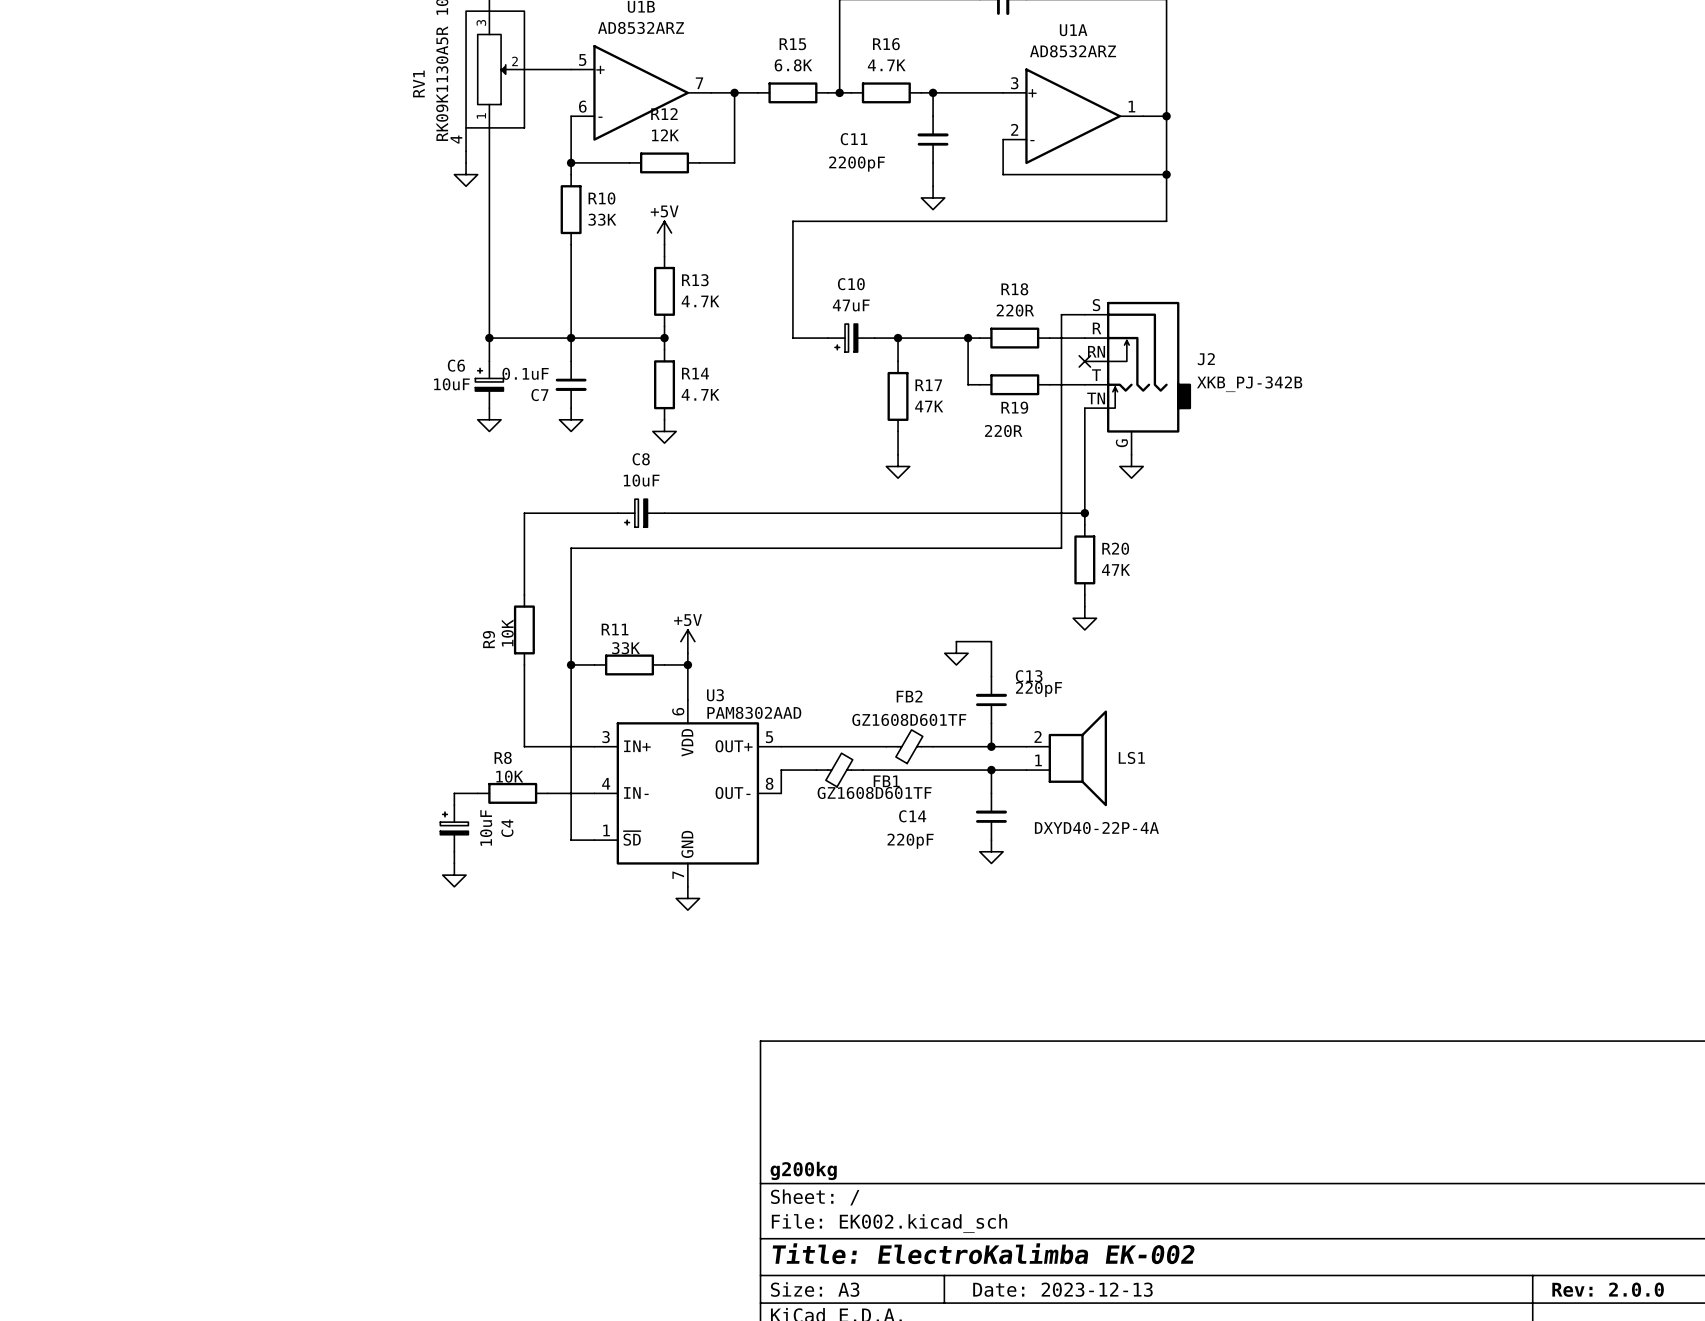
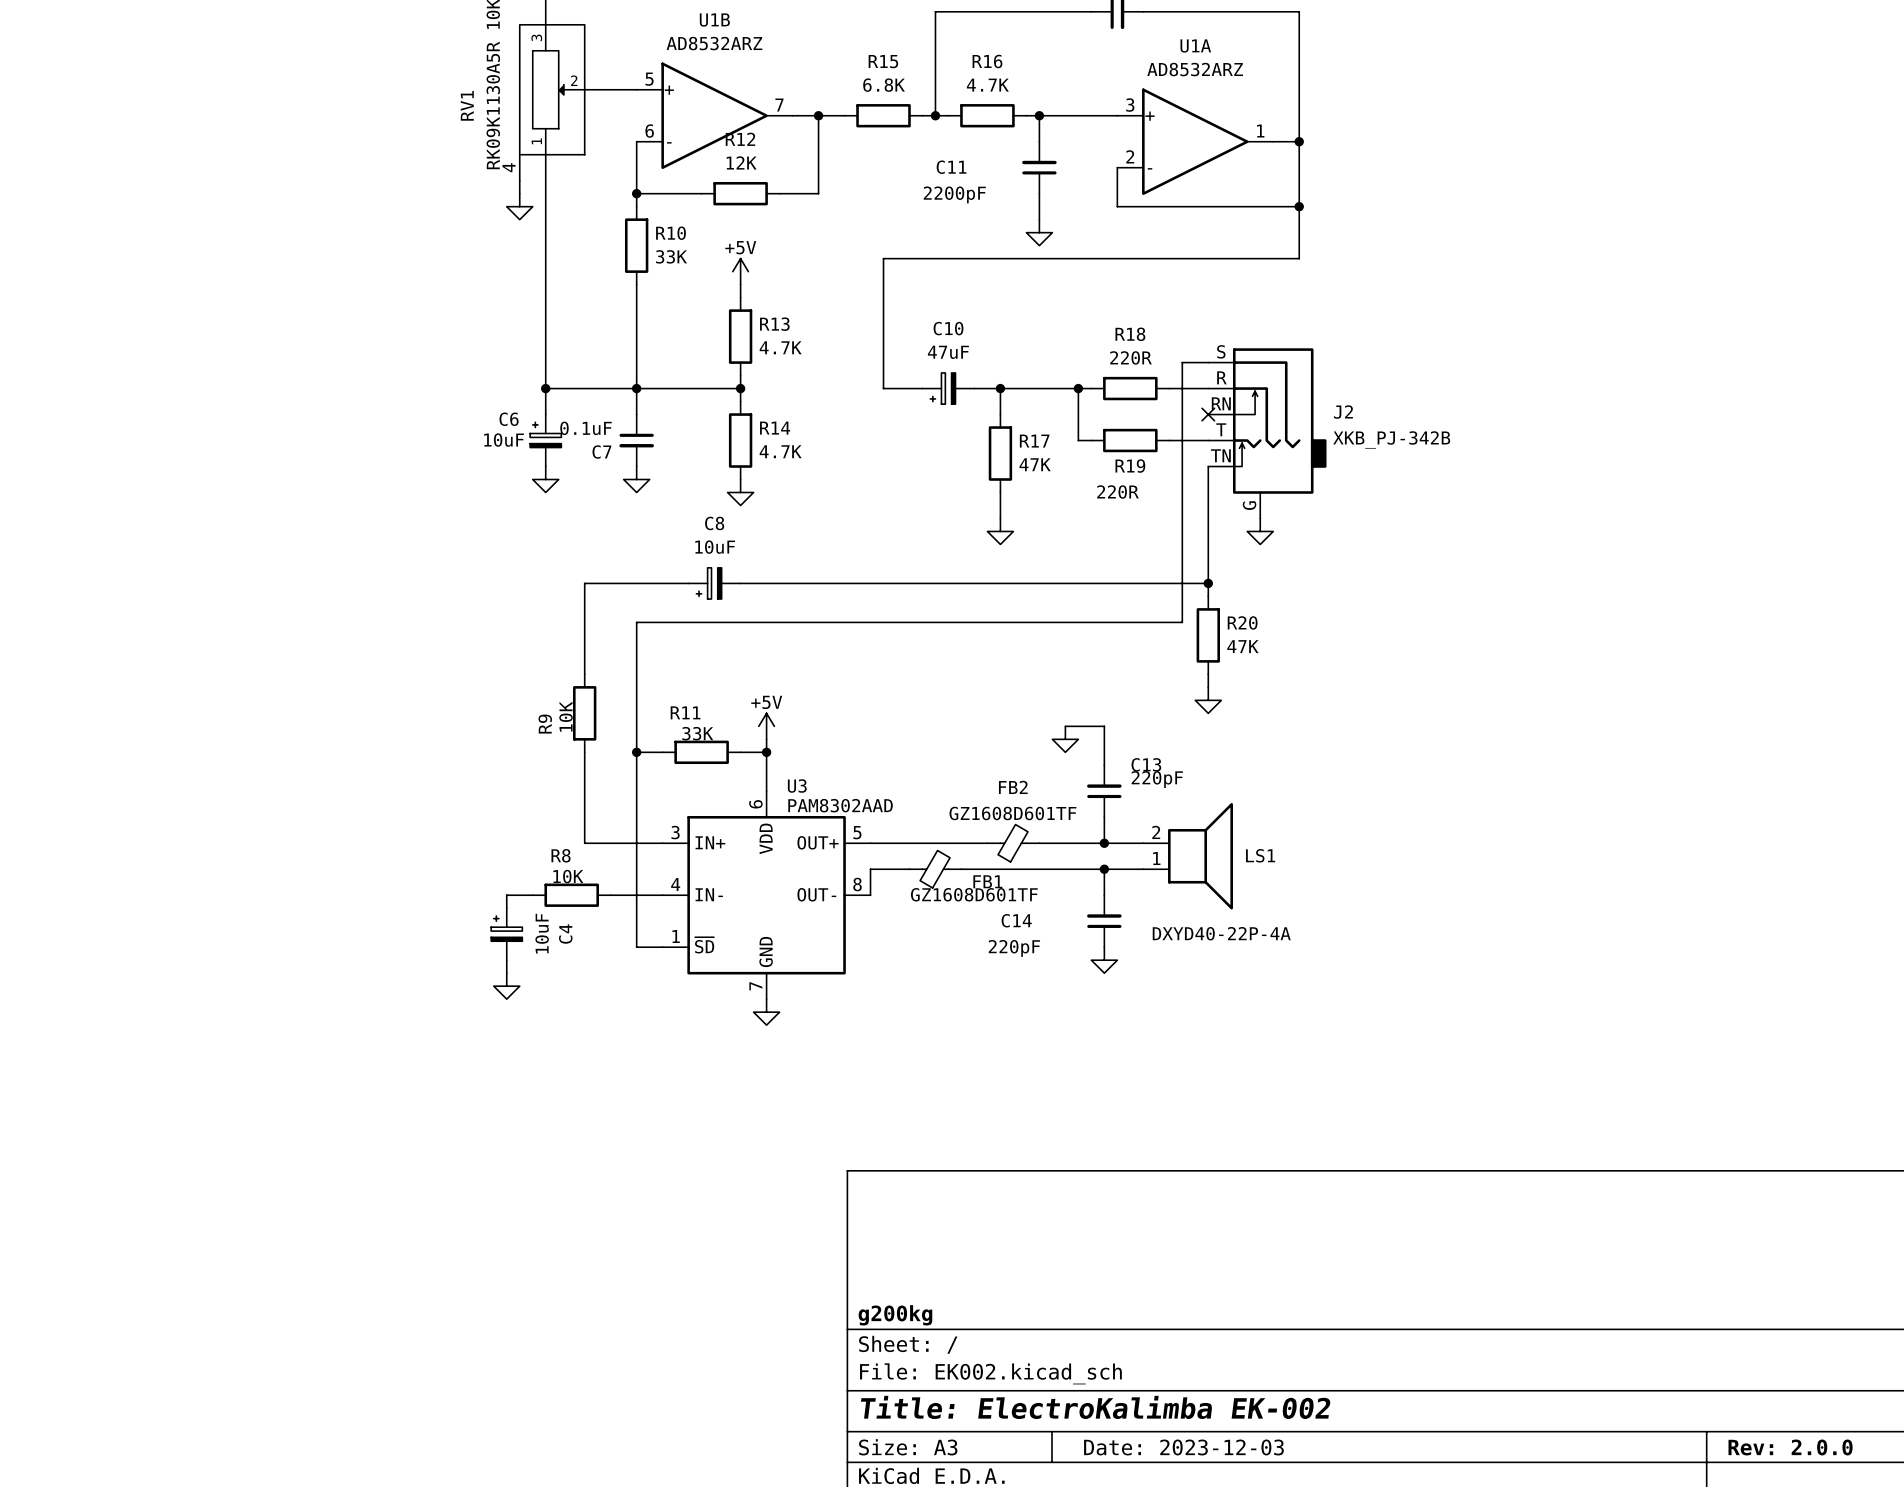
title block: Date: 2023-12-13 (1062, 1289) -> Date: 2023-12-03 (1183, 1447)

